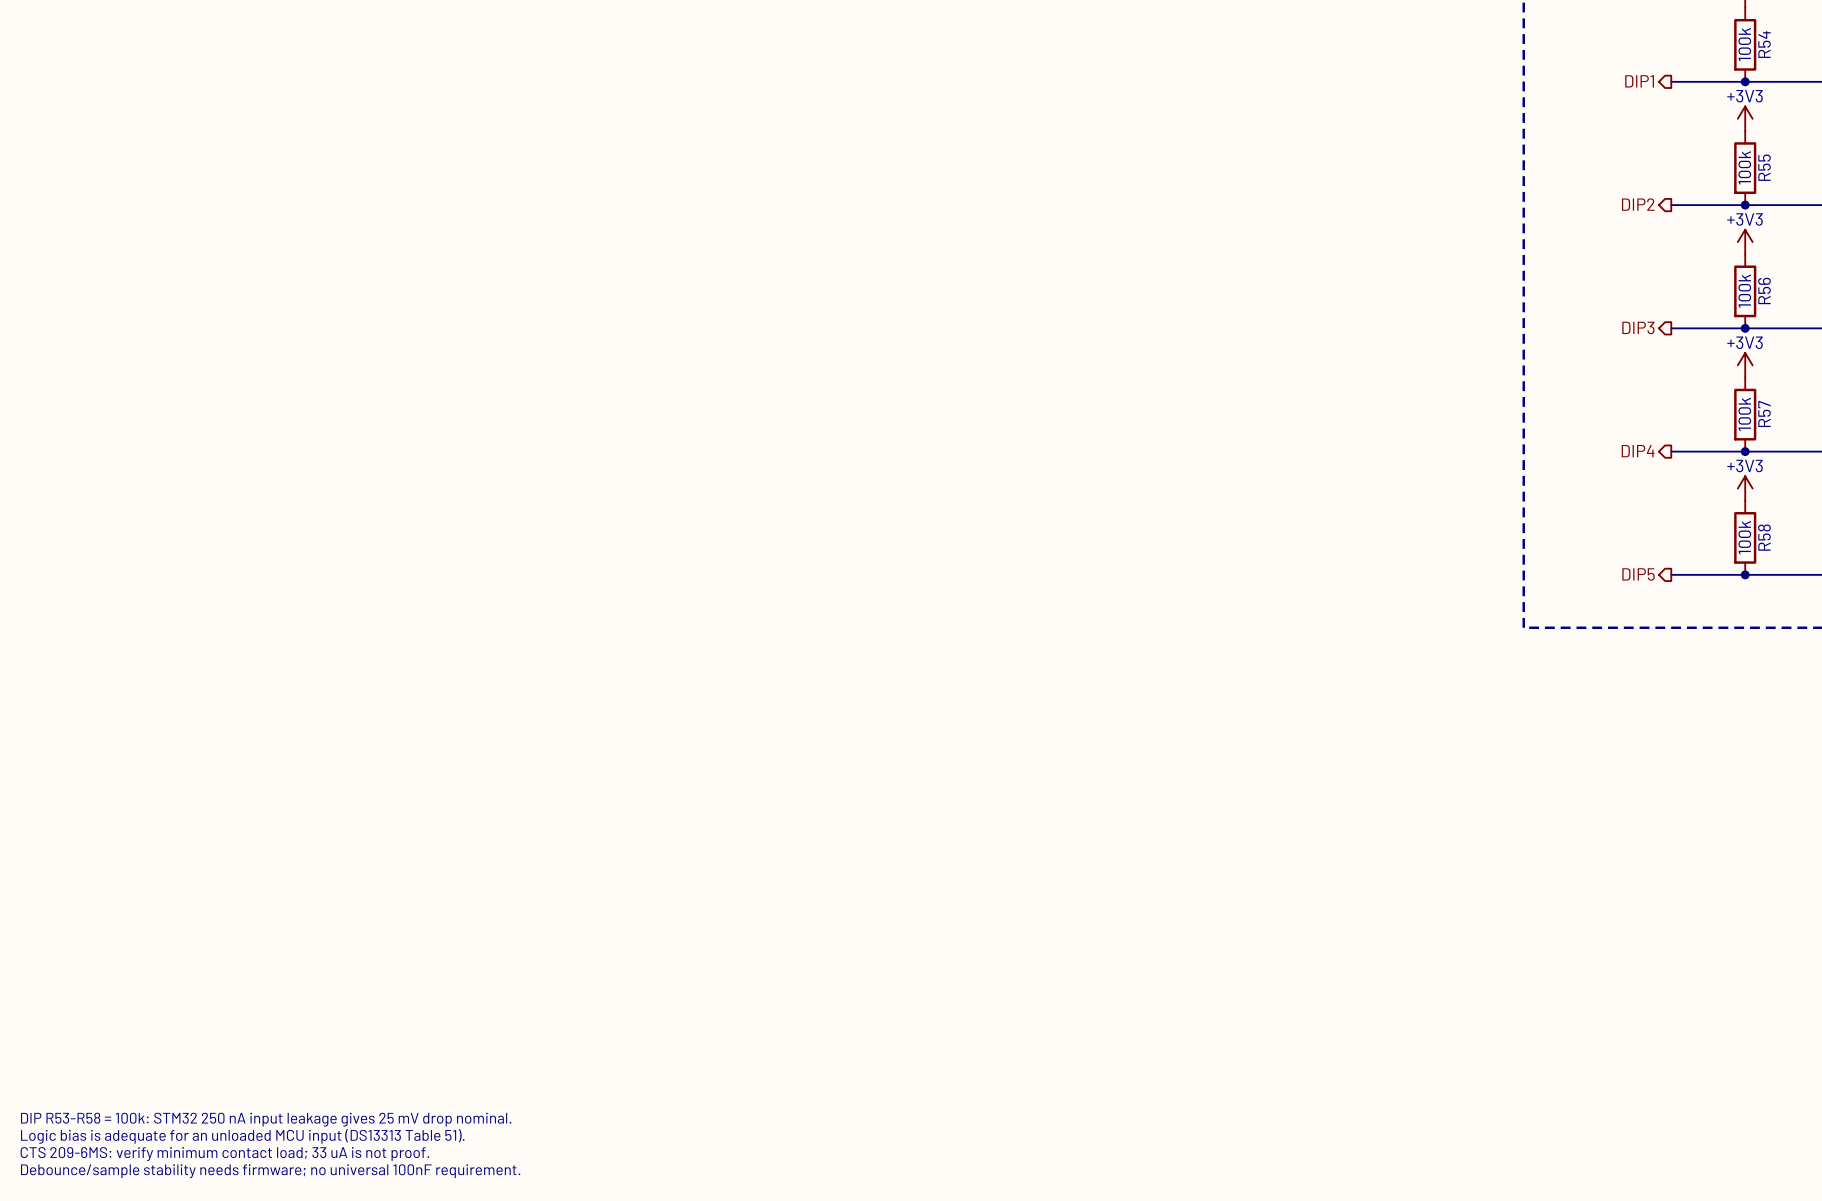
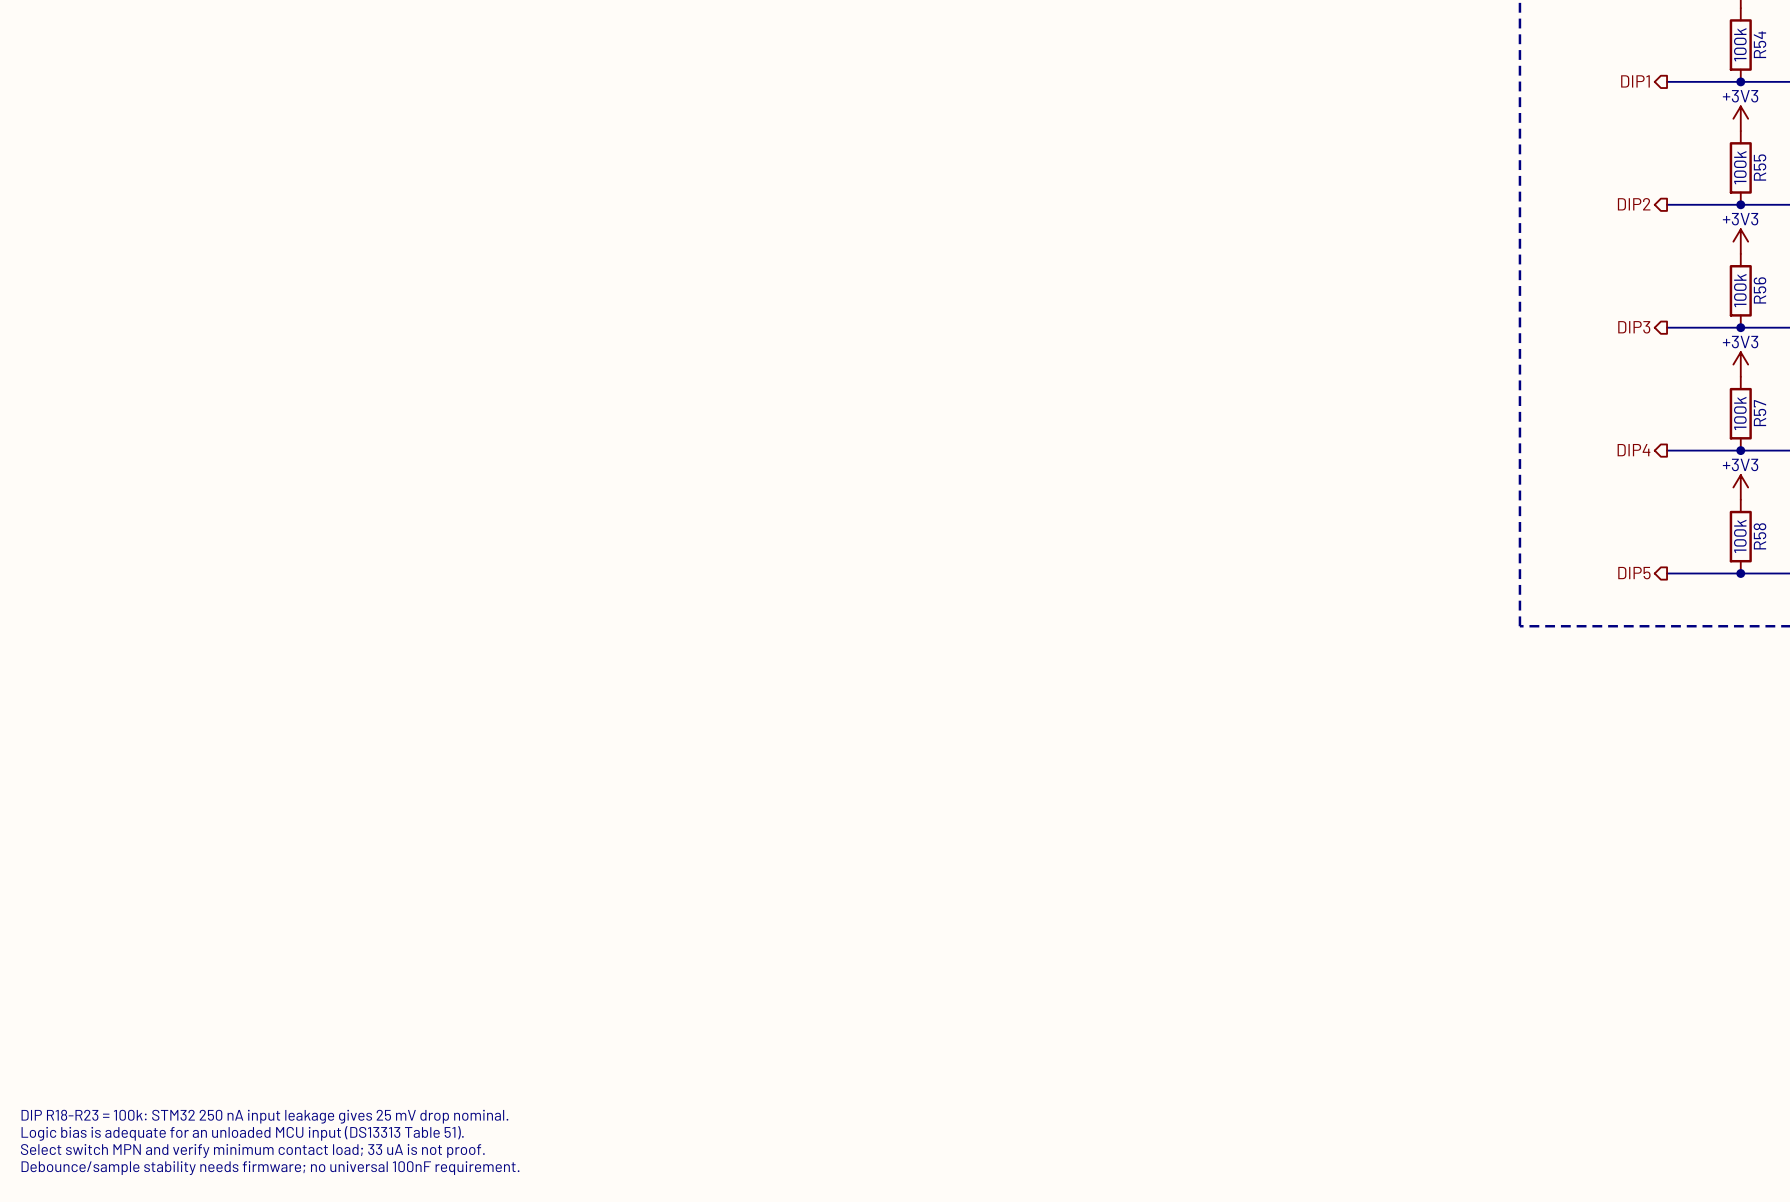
text: DIP R53-R58 = 100k: STM32 250 nA input leakage gives 25 mV drop nominal. (266, 1119) -> DIP R18-R23 = 100k: STM32 250 nA input leakage gives 25 mV drop nominal. (264, 1116)
text: CTS 209-6MS: verify minimum contact load; 33 uA is not proof. (224, 1154) -> Select switch MPN and verify minimum contact load; 33 uA is not proof. (252, 1150)

